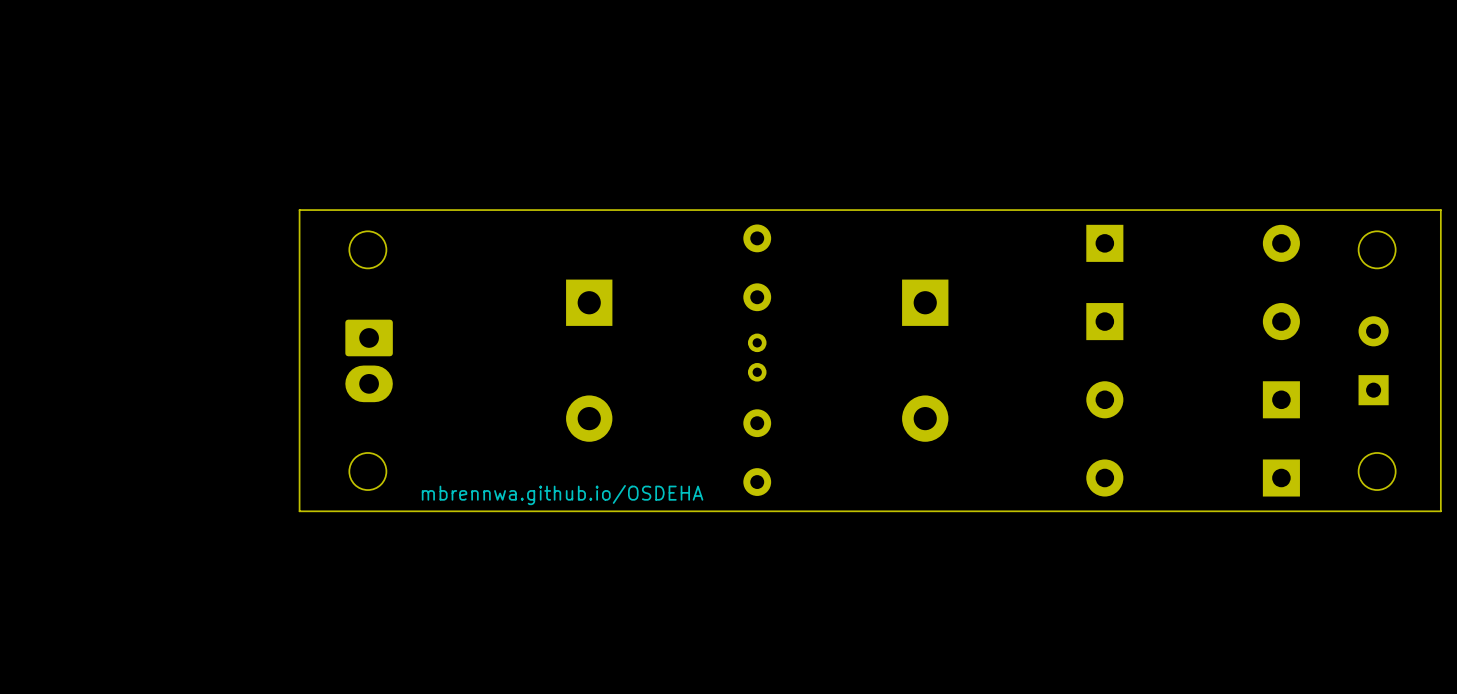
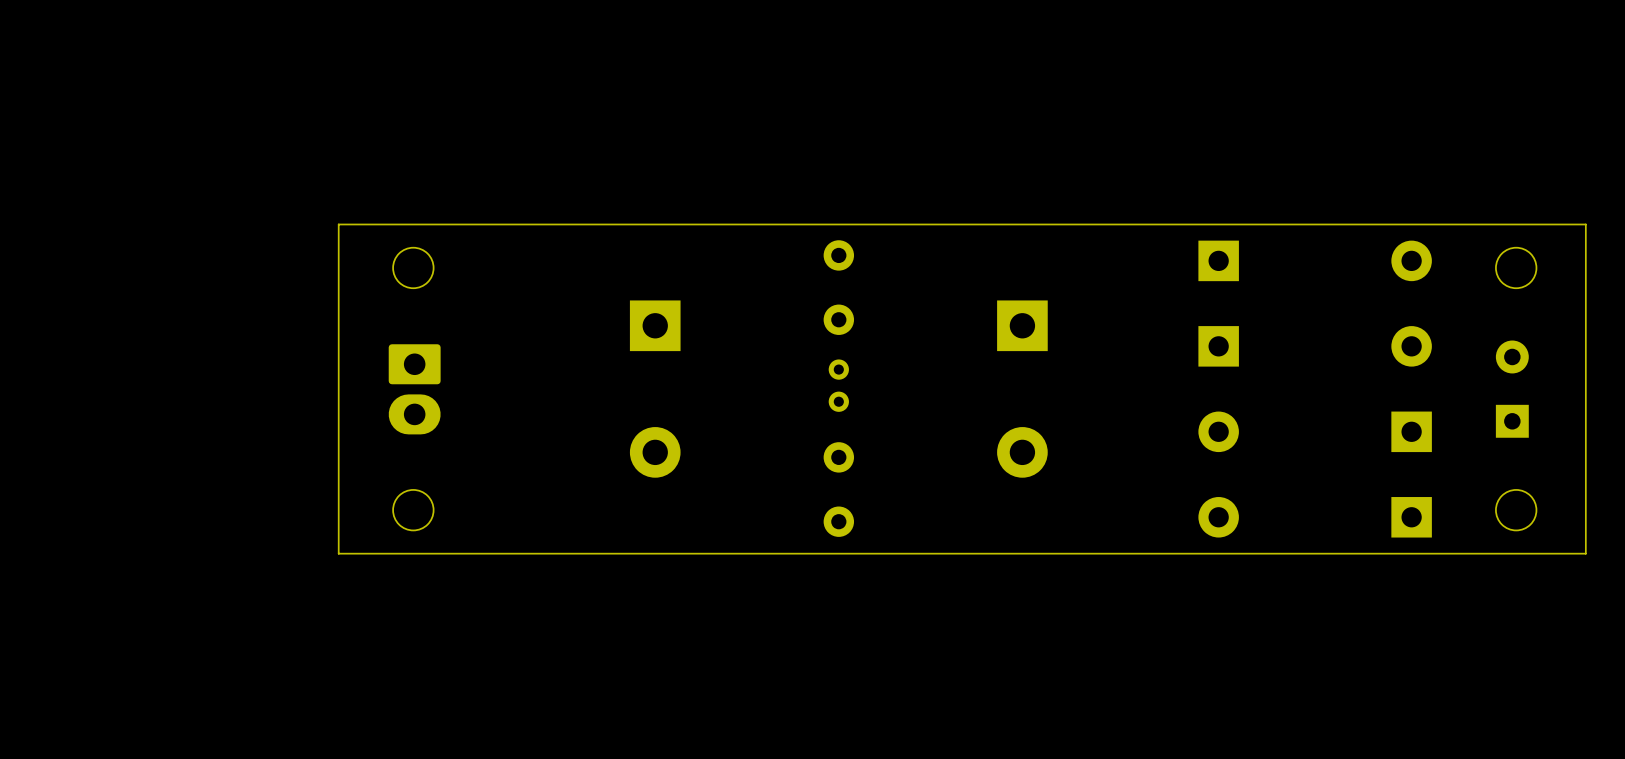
text: mbrennwa.github.io/OSDEHA (562, 495) -> none

